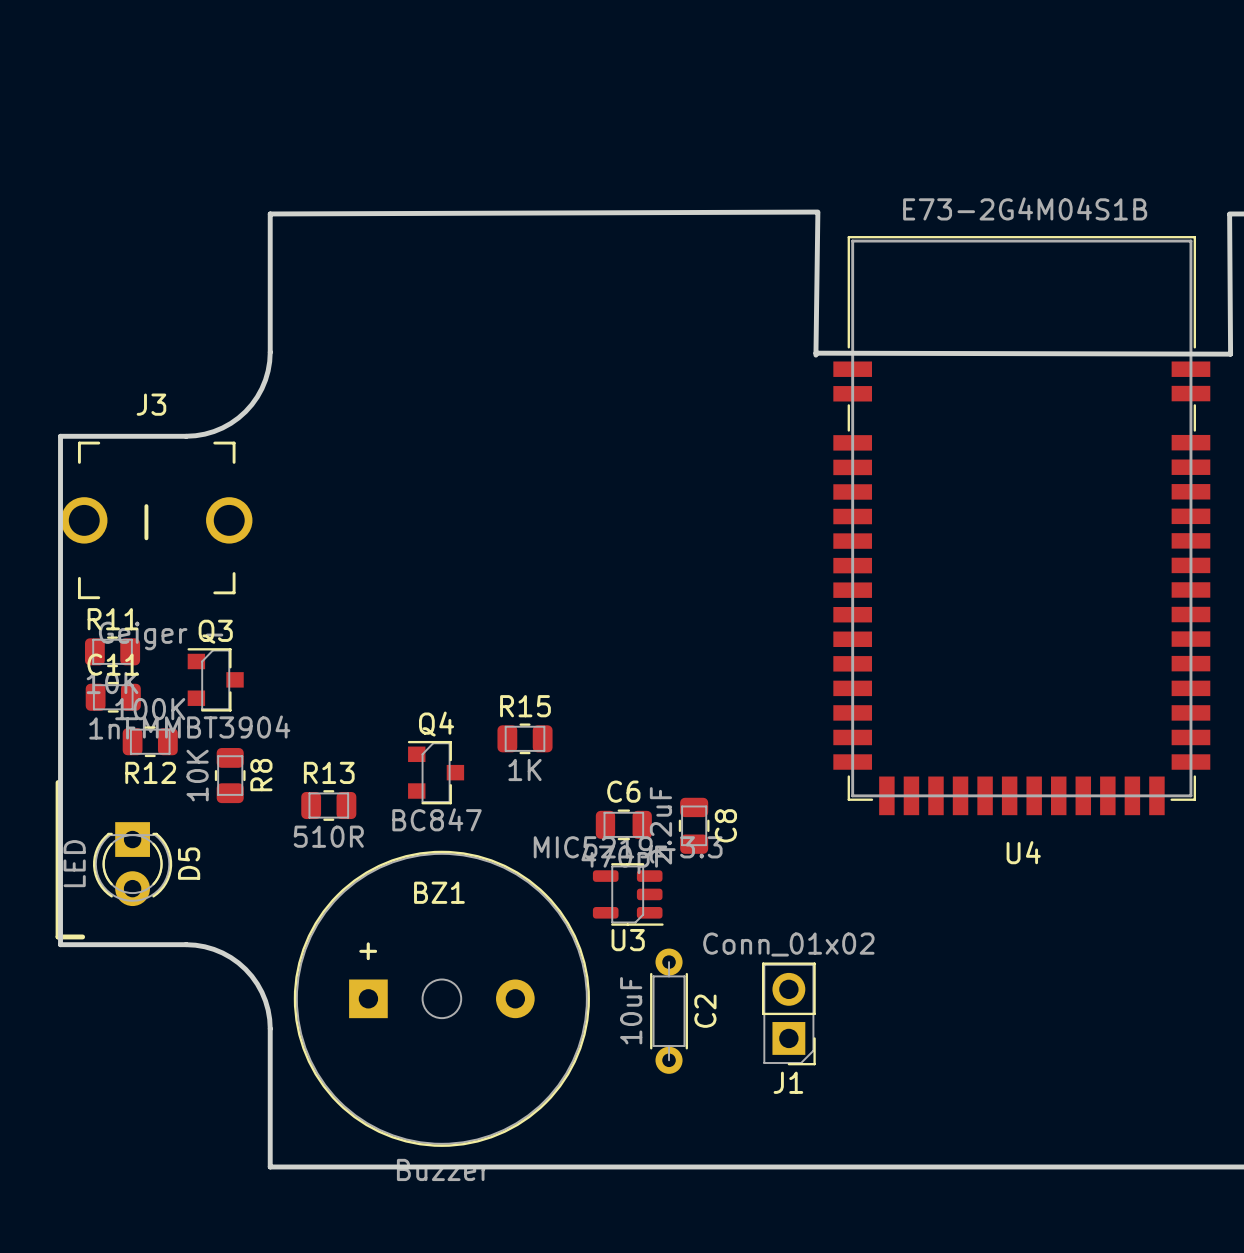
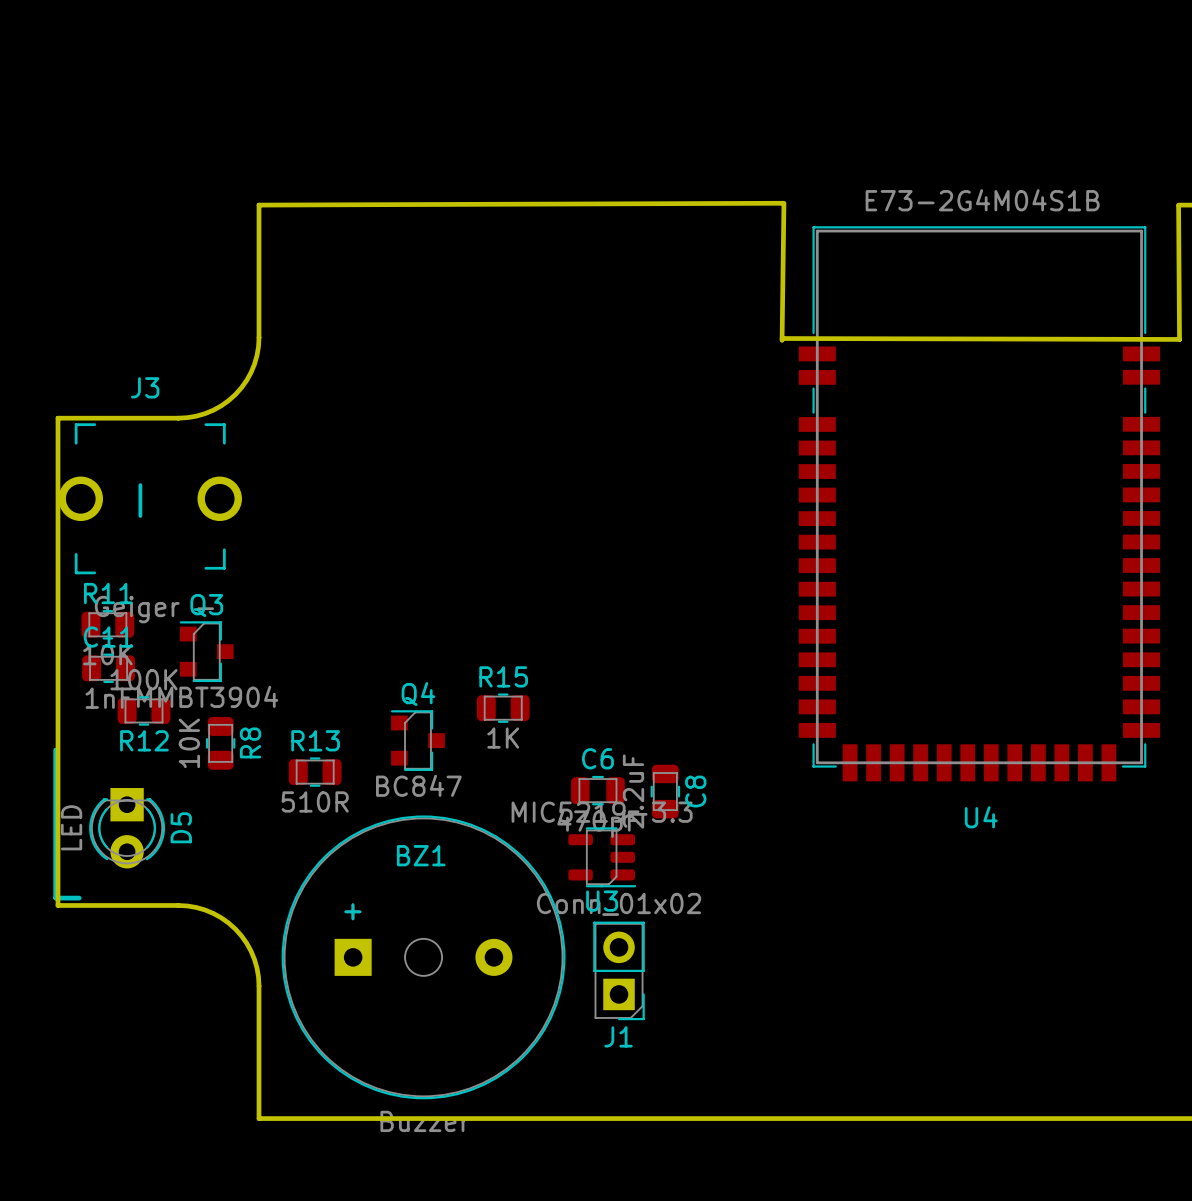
C2: 10uF (669, 1011) -> none
J1 position: (788, 1013) -> (619, 970)

